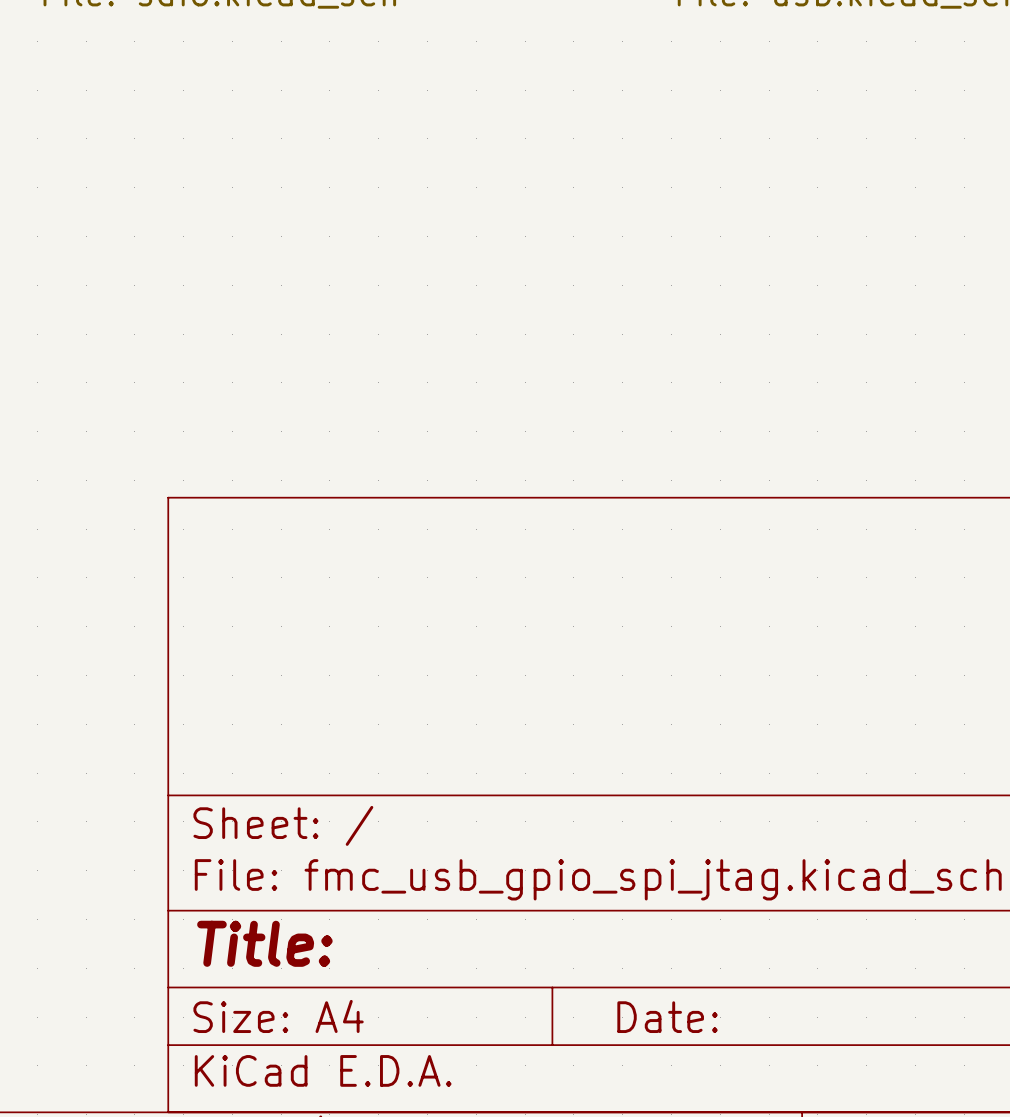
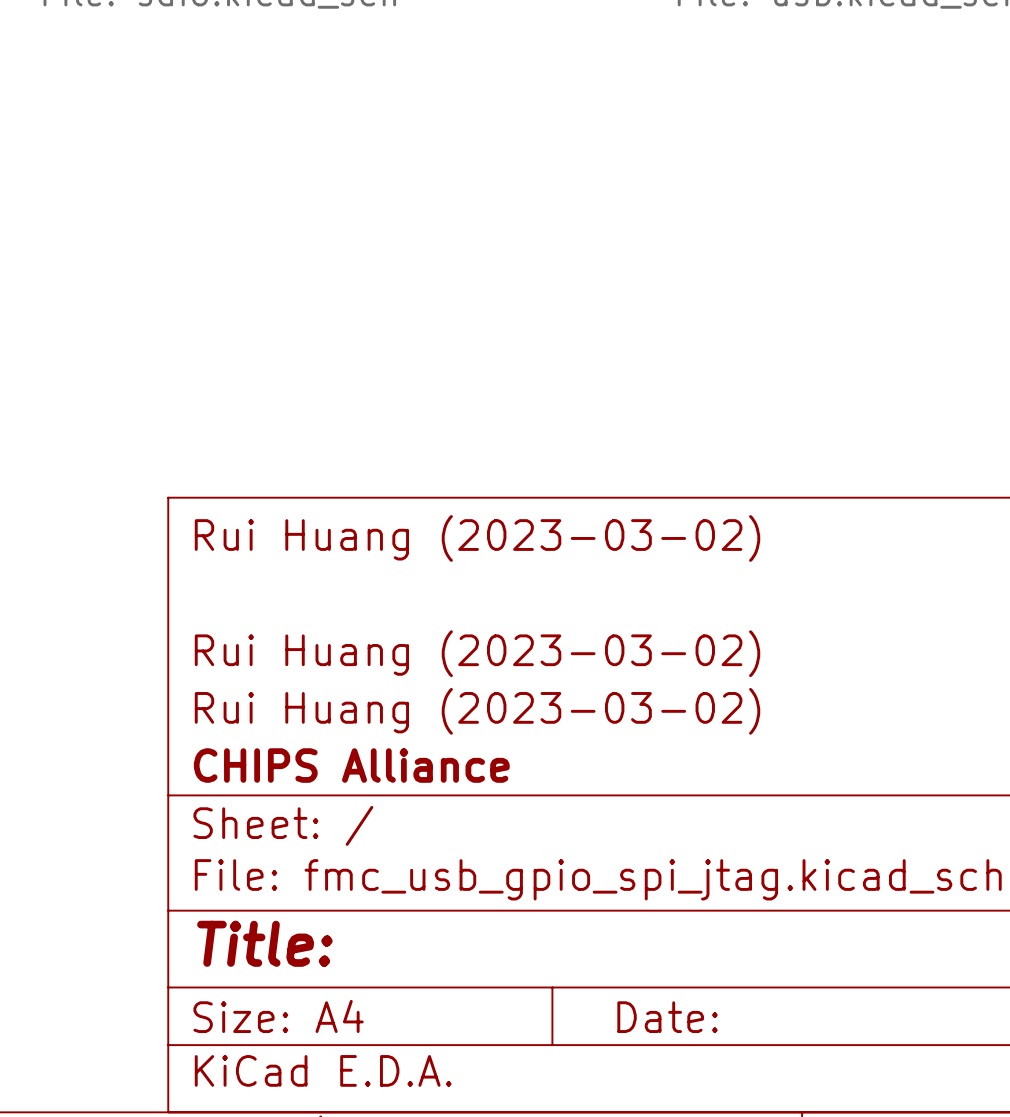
title block: none -> Rui Huang (2023-03-02) (477, 538)
title block: none -> Rui Huang (2023-03-02) (477, 653)
title block: none -> Rui Huang (2023-03-02) (477, 711)
title block: none -> CHIPS Alliance (351, 765)

